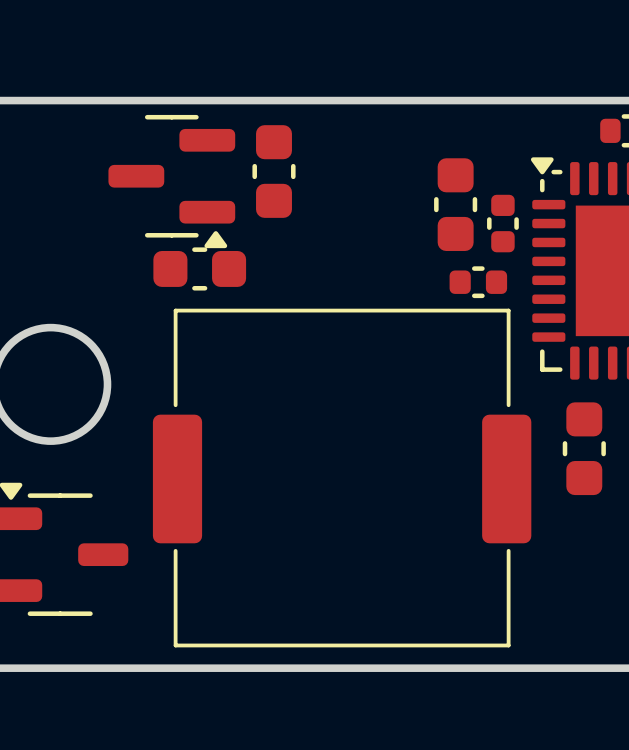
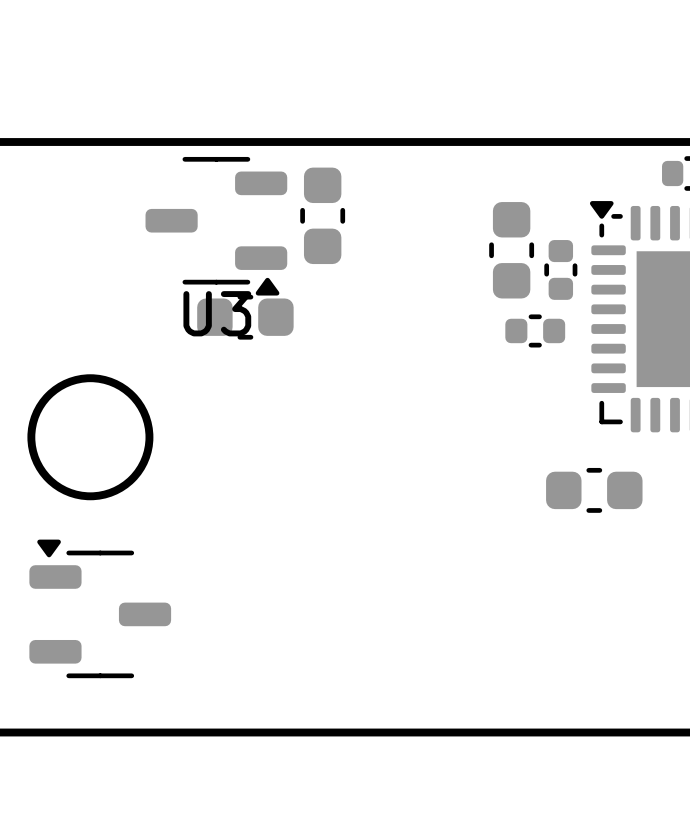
part: (171, 181) -> none
U3: none -> (216, 226)
part rotation: 0° (584, 448) -> 90° clockwise (594, 490)
part: (342, 478) -> none

